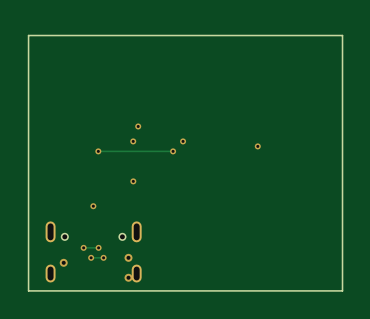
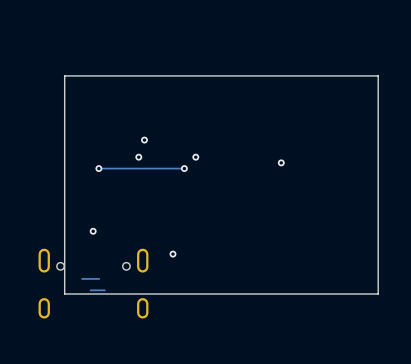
board edge: (342, 70) (342, 35) (28, 35) (28, 290) (342, 290) (342, 261) -> (378, 75) (64, 75) (64, 293) (378, 293)
via: (133, 181) -> none
via: none -> (172, 254)
via: (83, 247) -> none
via: (98, 247) -> none
via: (91, 257) -> none
via: (103, 257) -> none
via: (128, 257) -> none
via: (63, 262) -> none
via: (128, 277) -> none

